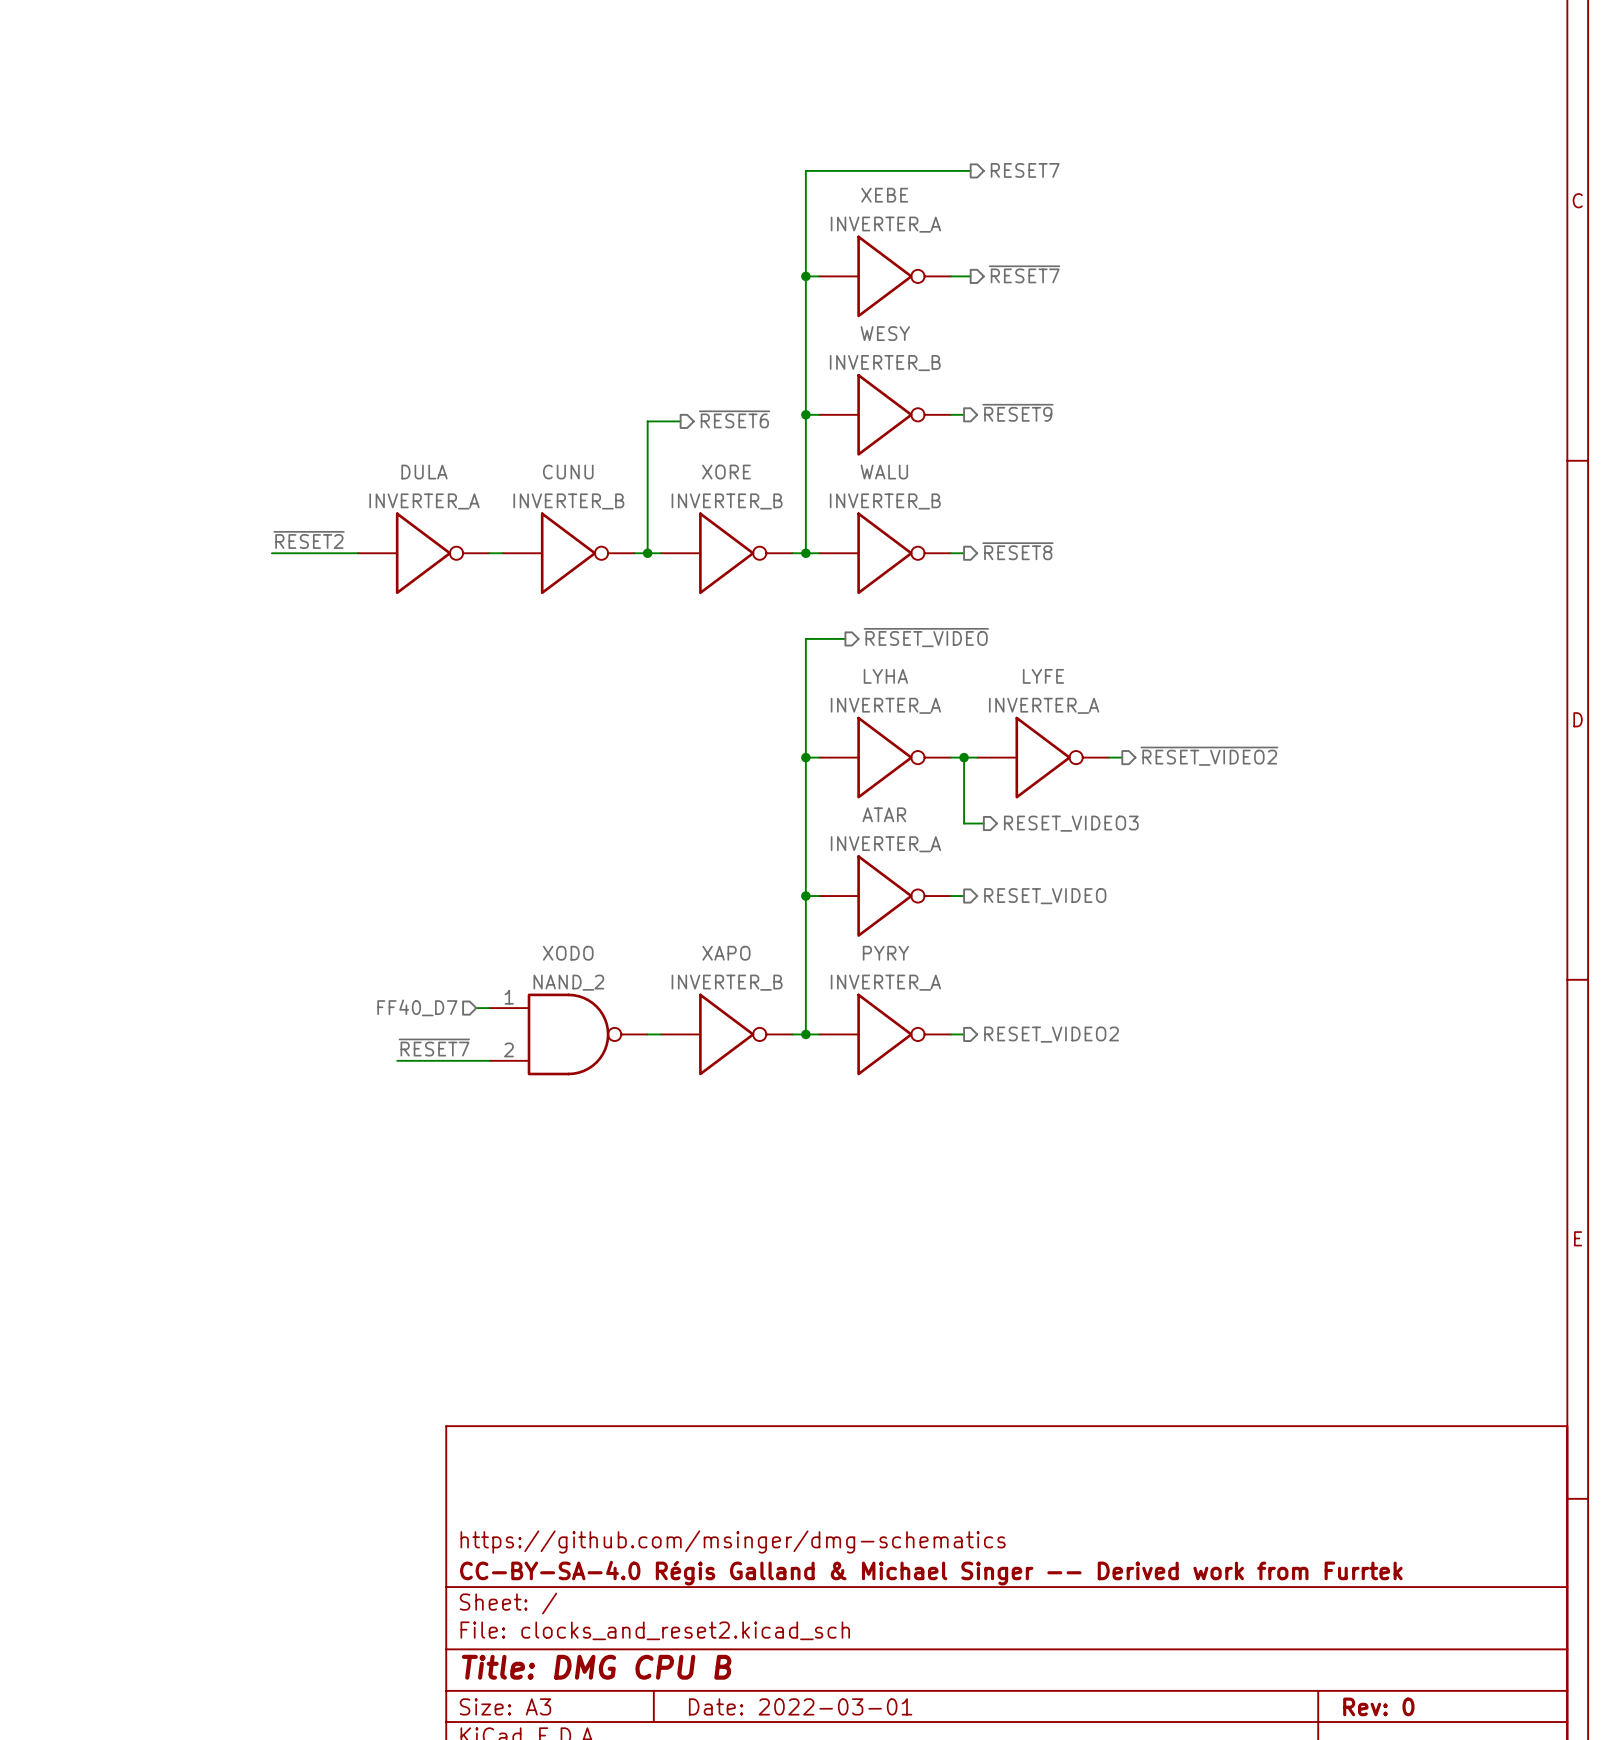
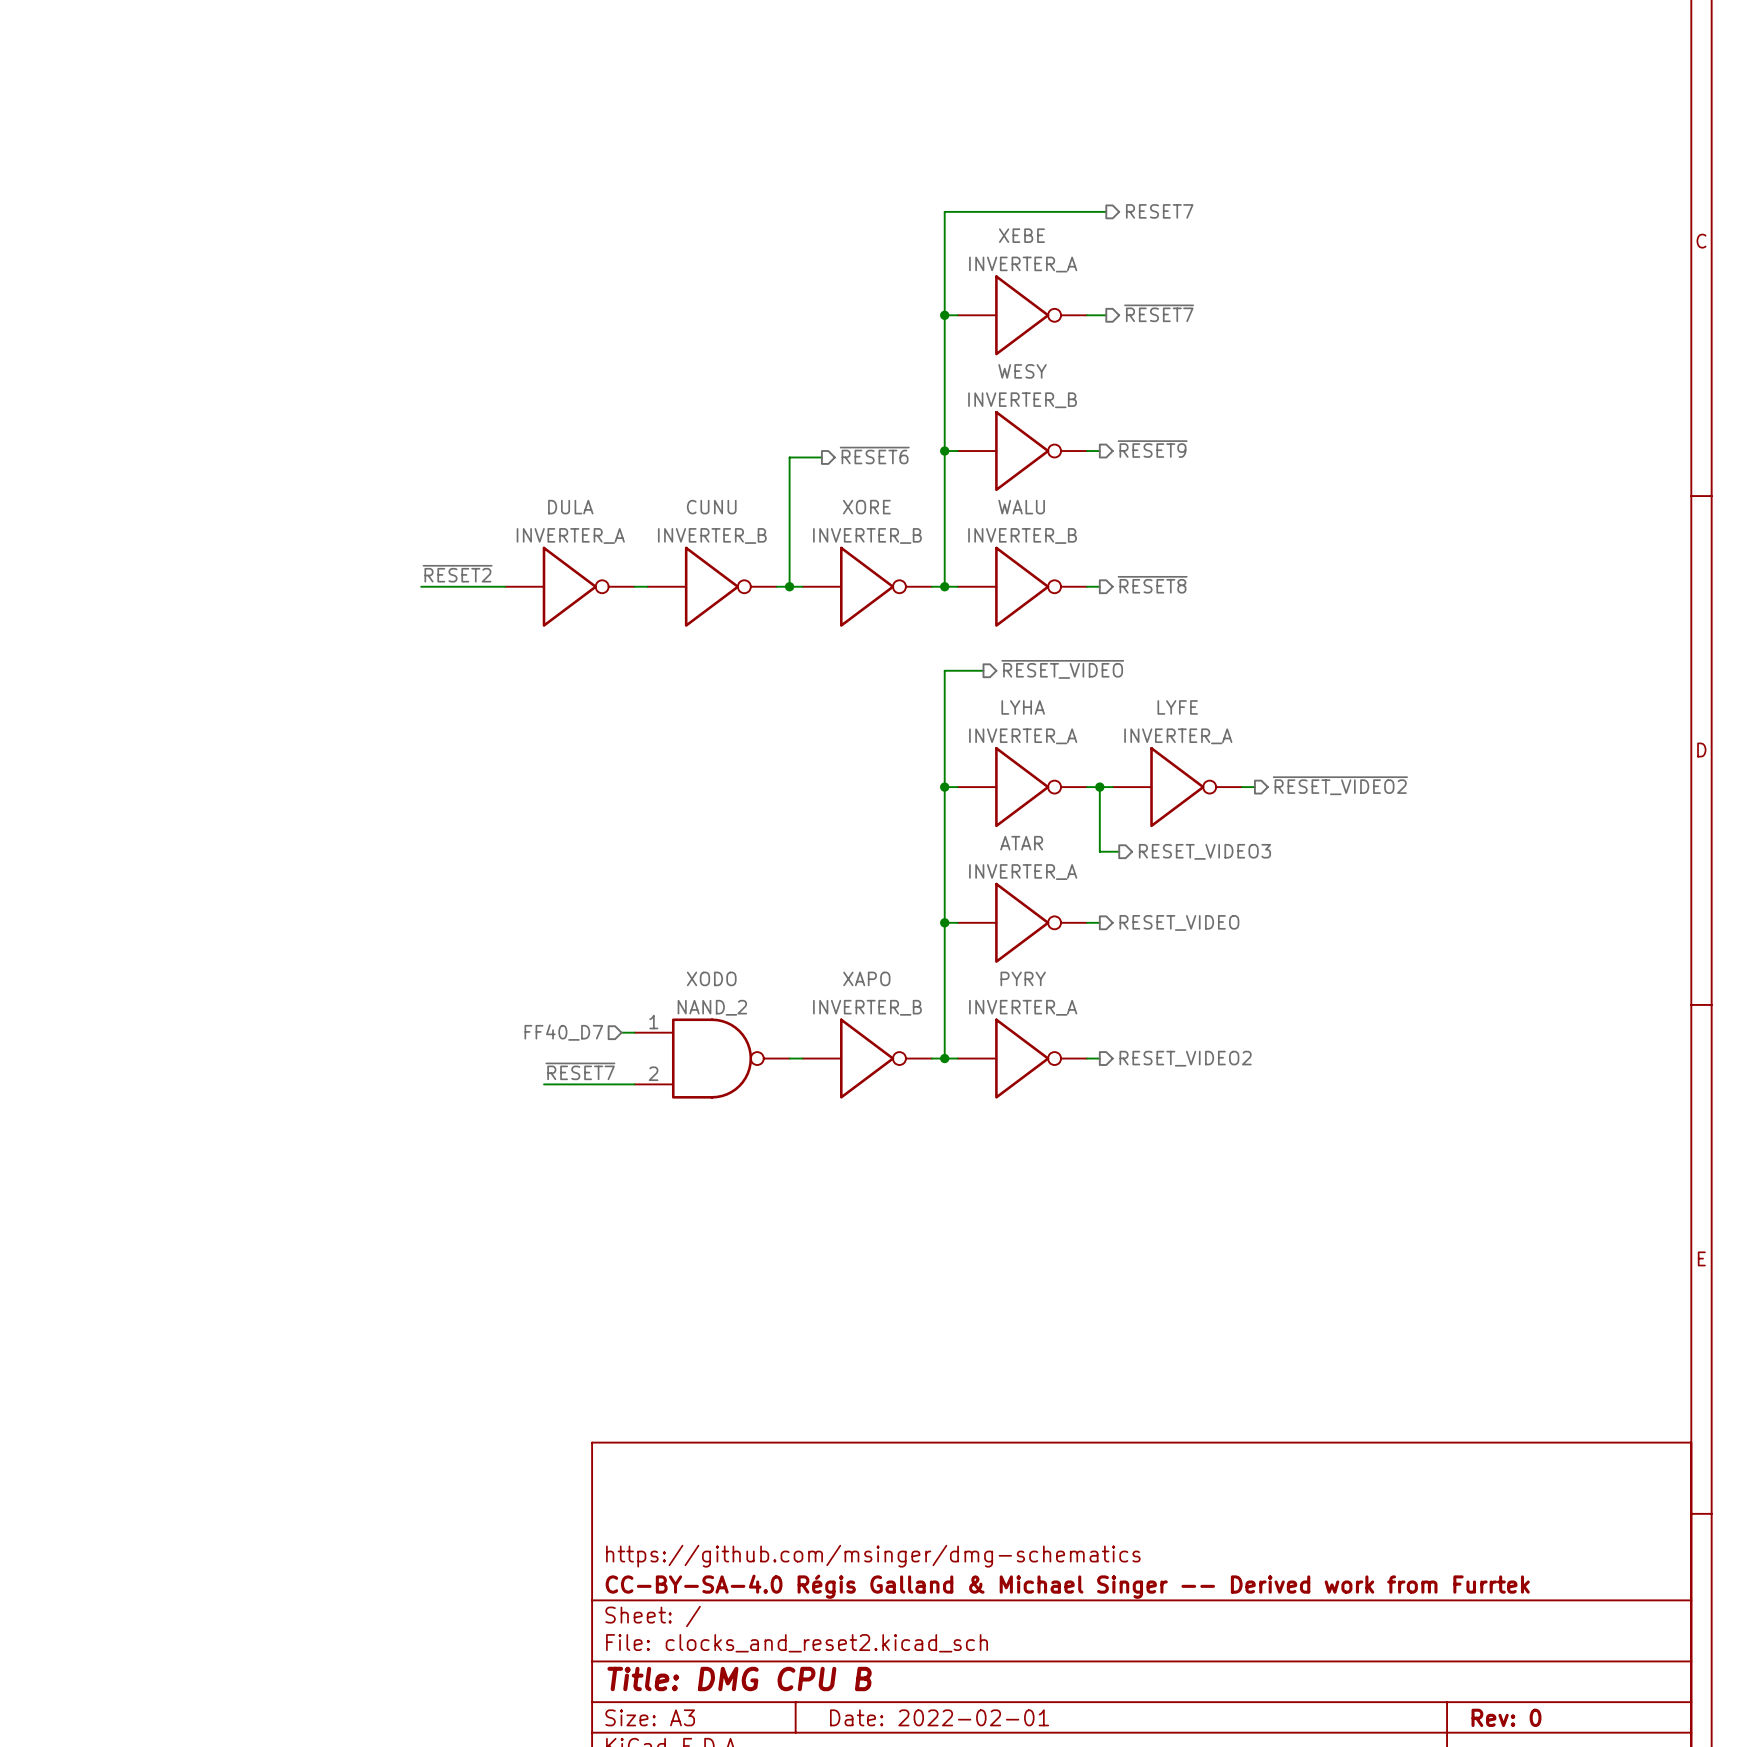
title block: Date: 2022-03-01 (800, 1706) -> Date: 2022-02-01 (939, 1717)

